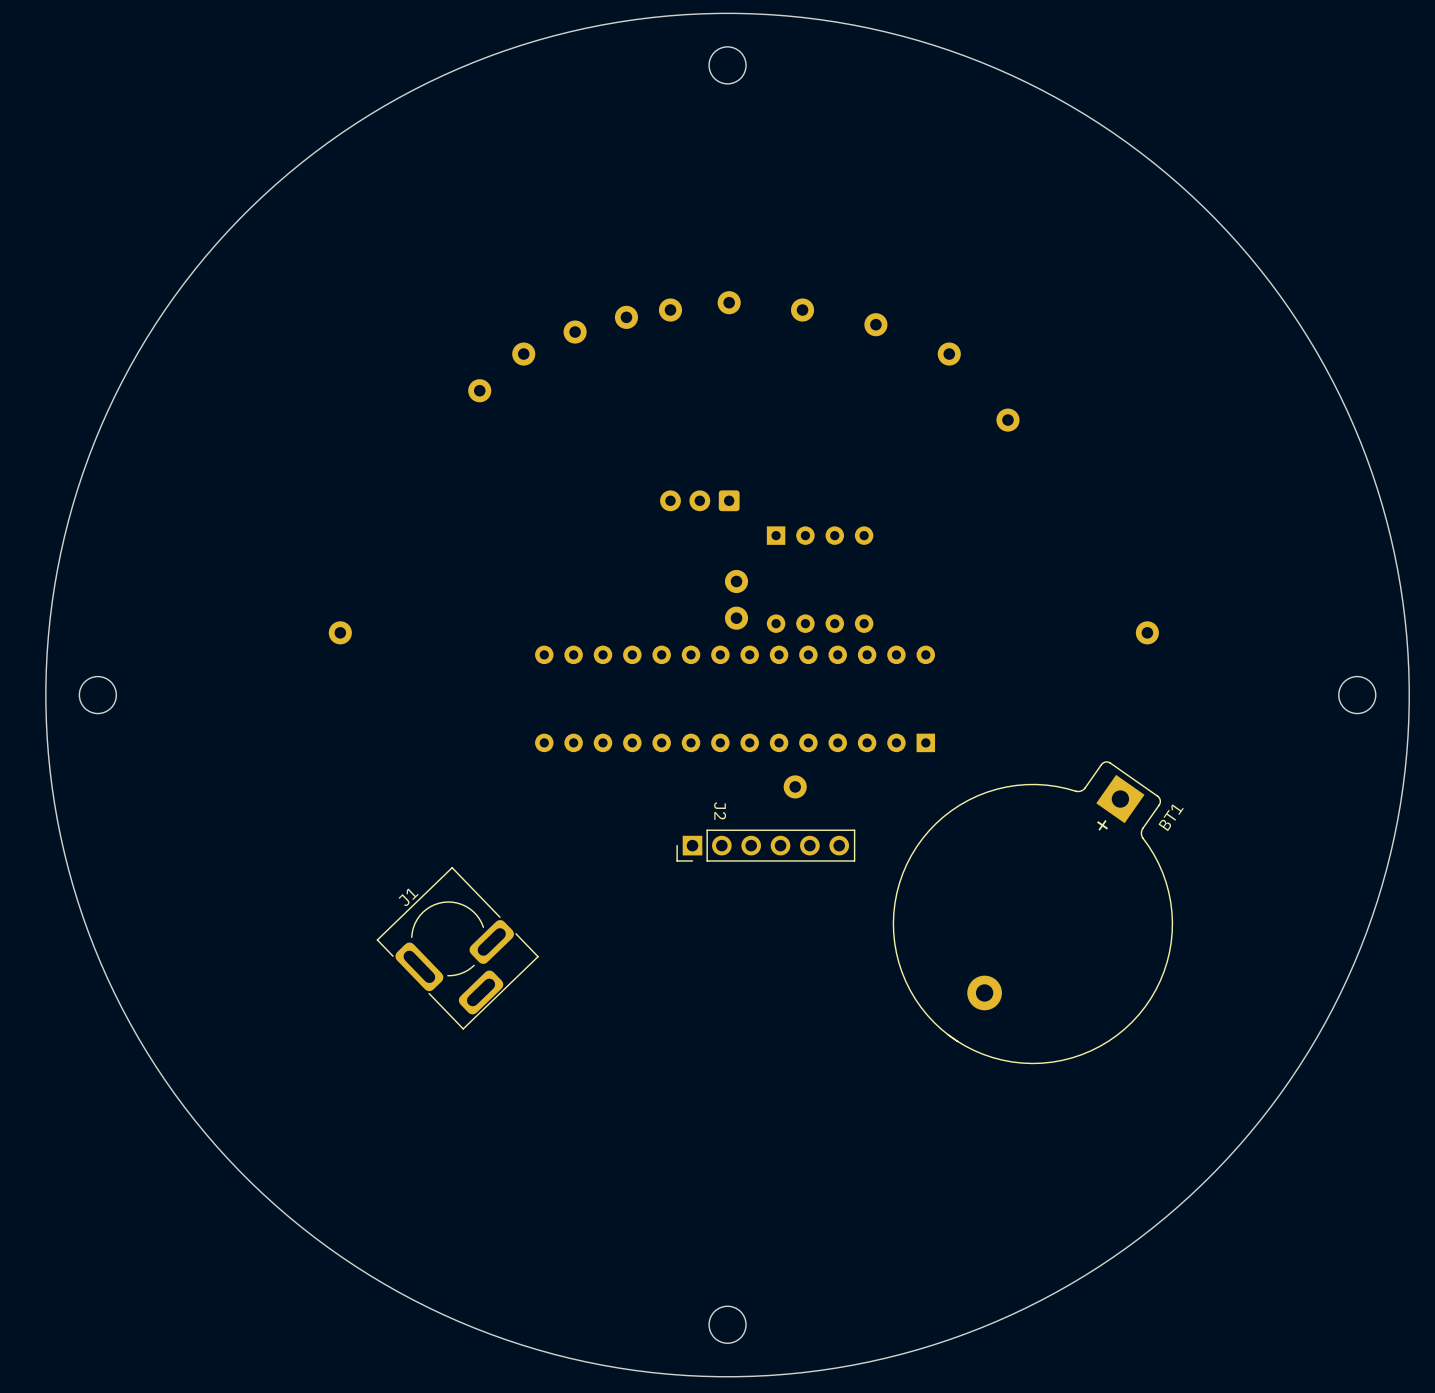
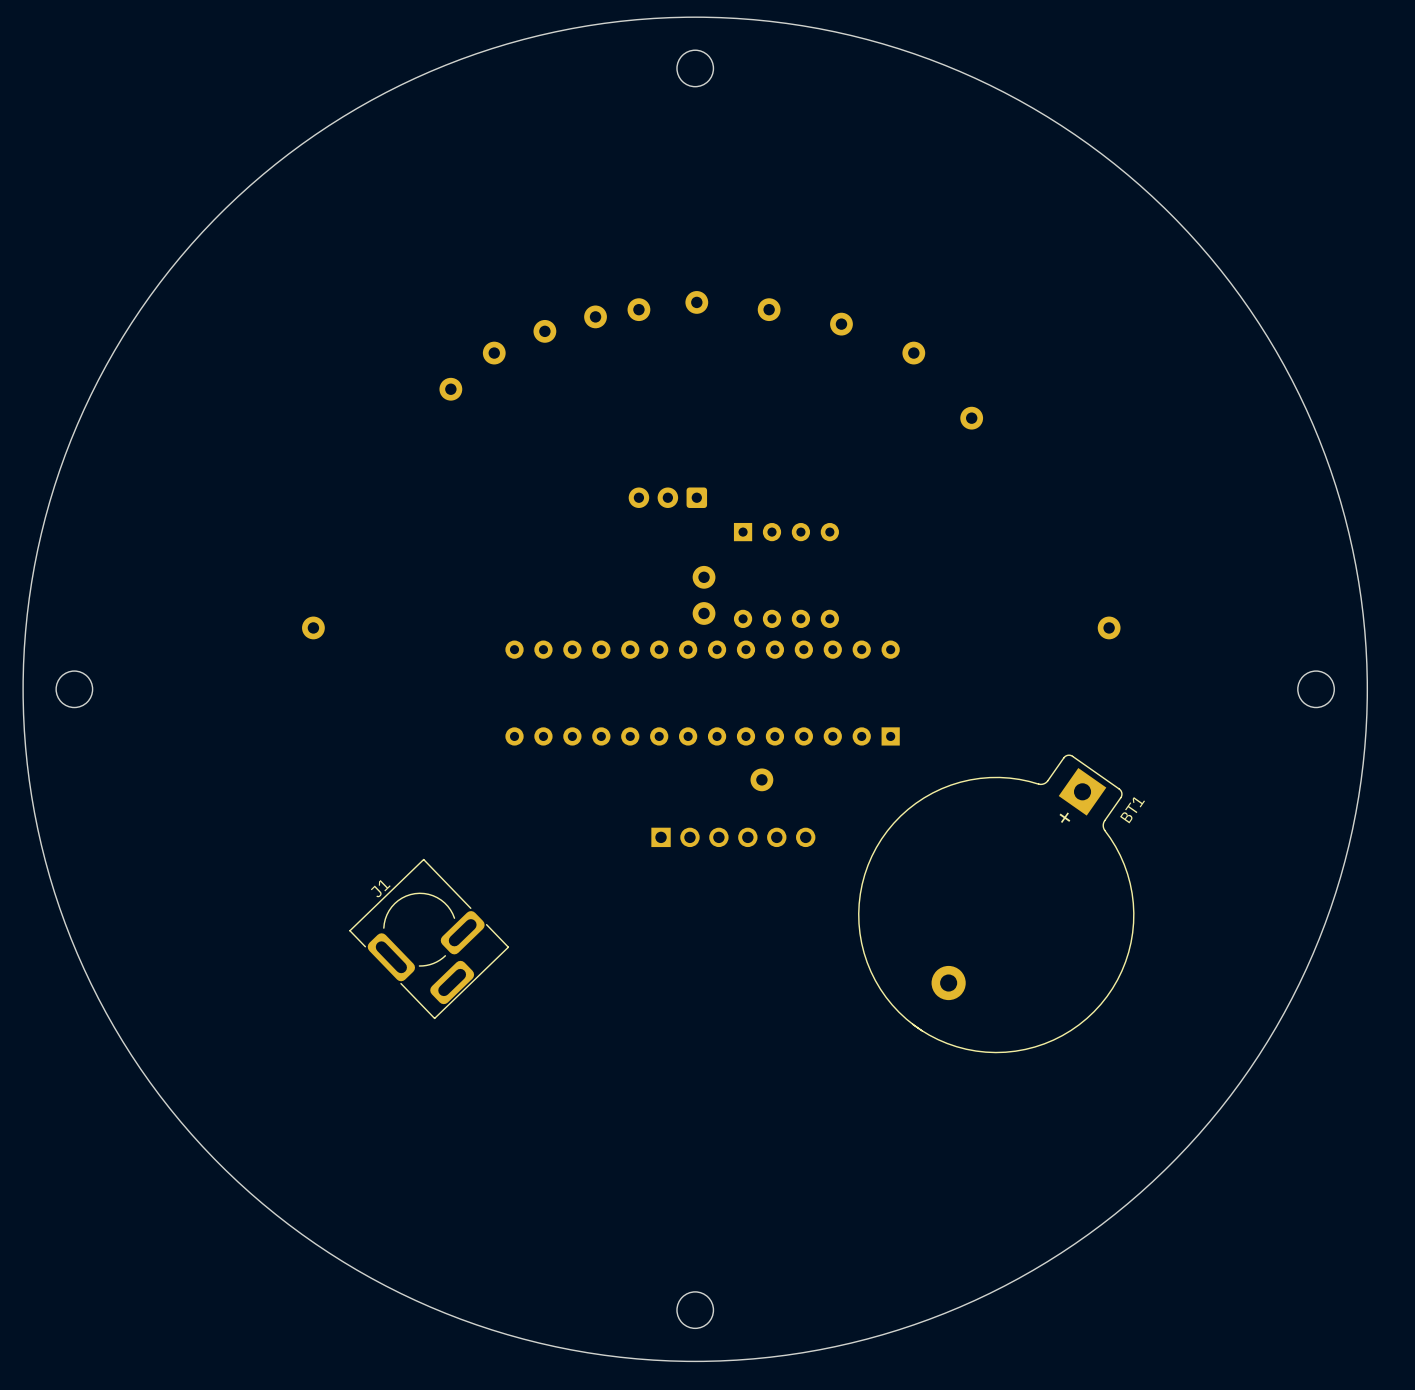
J2 side: bottom (765, 845) -> top (733, 837)

